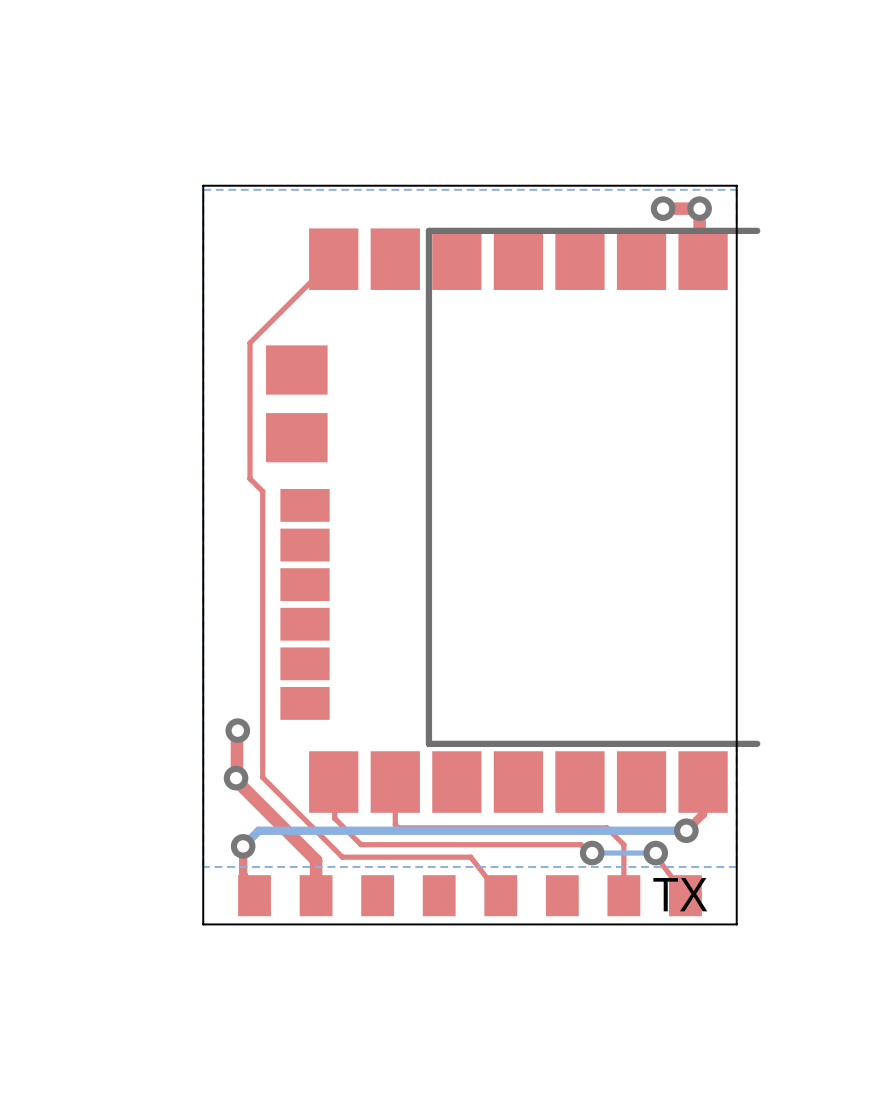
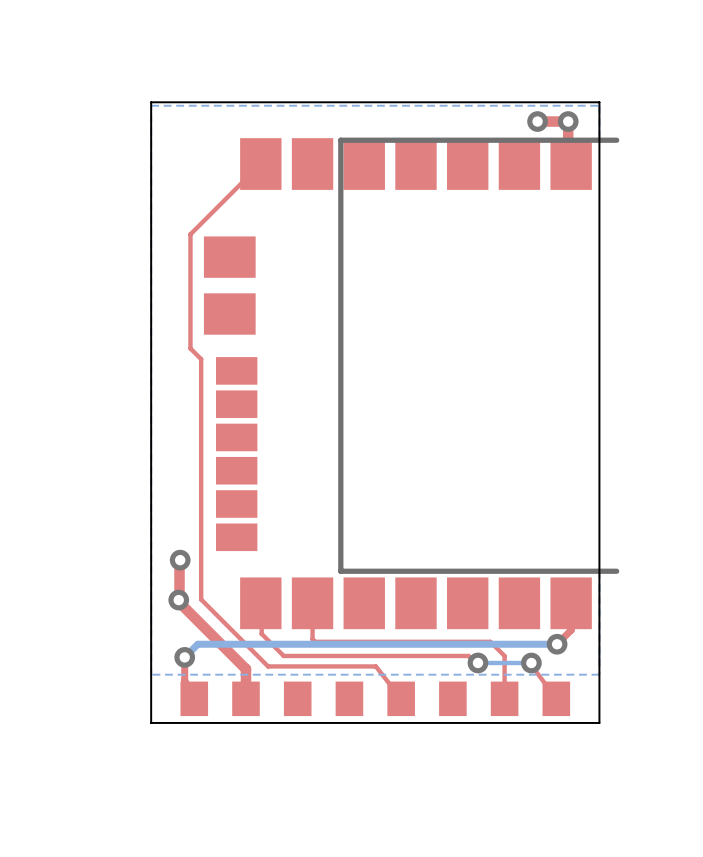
part text: TX (680, 894) -> none

